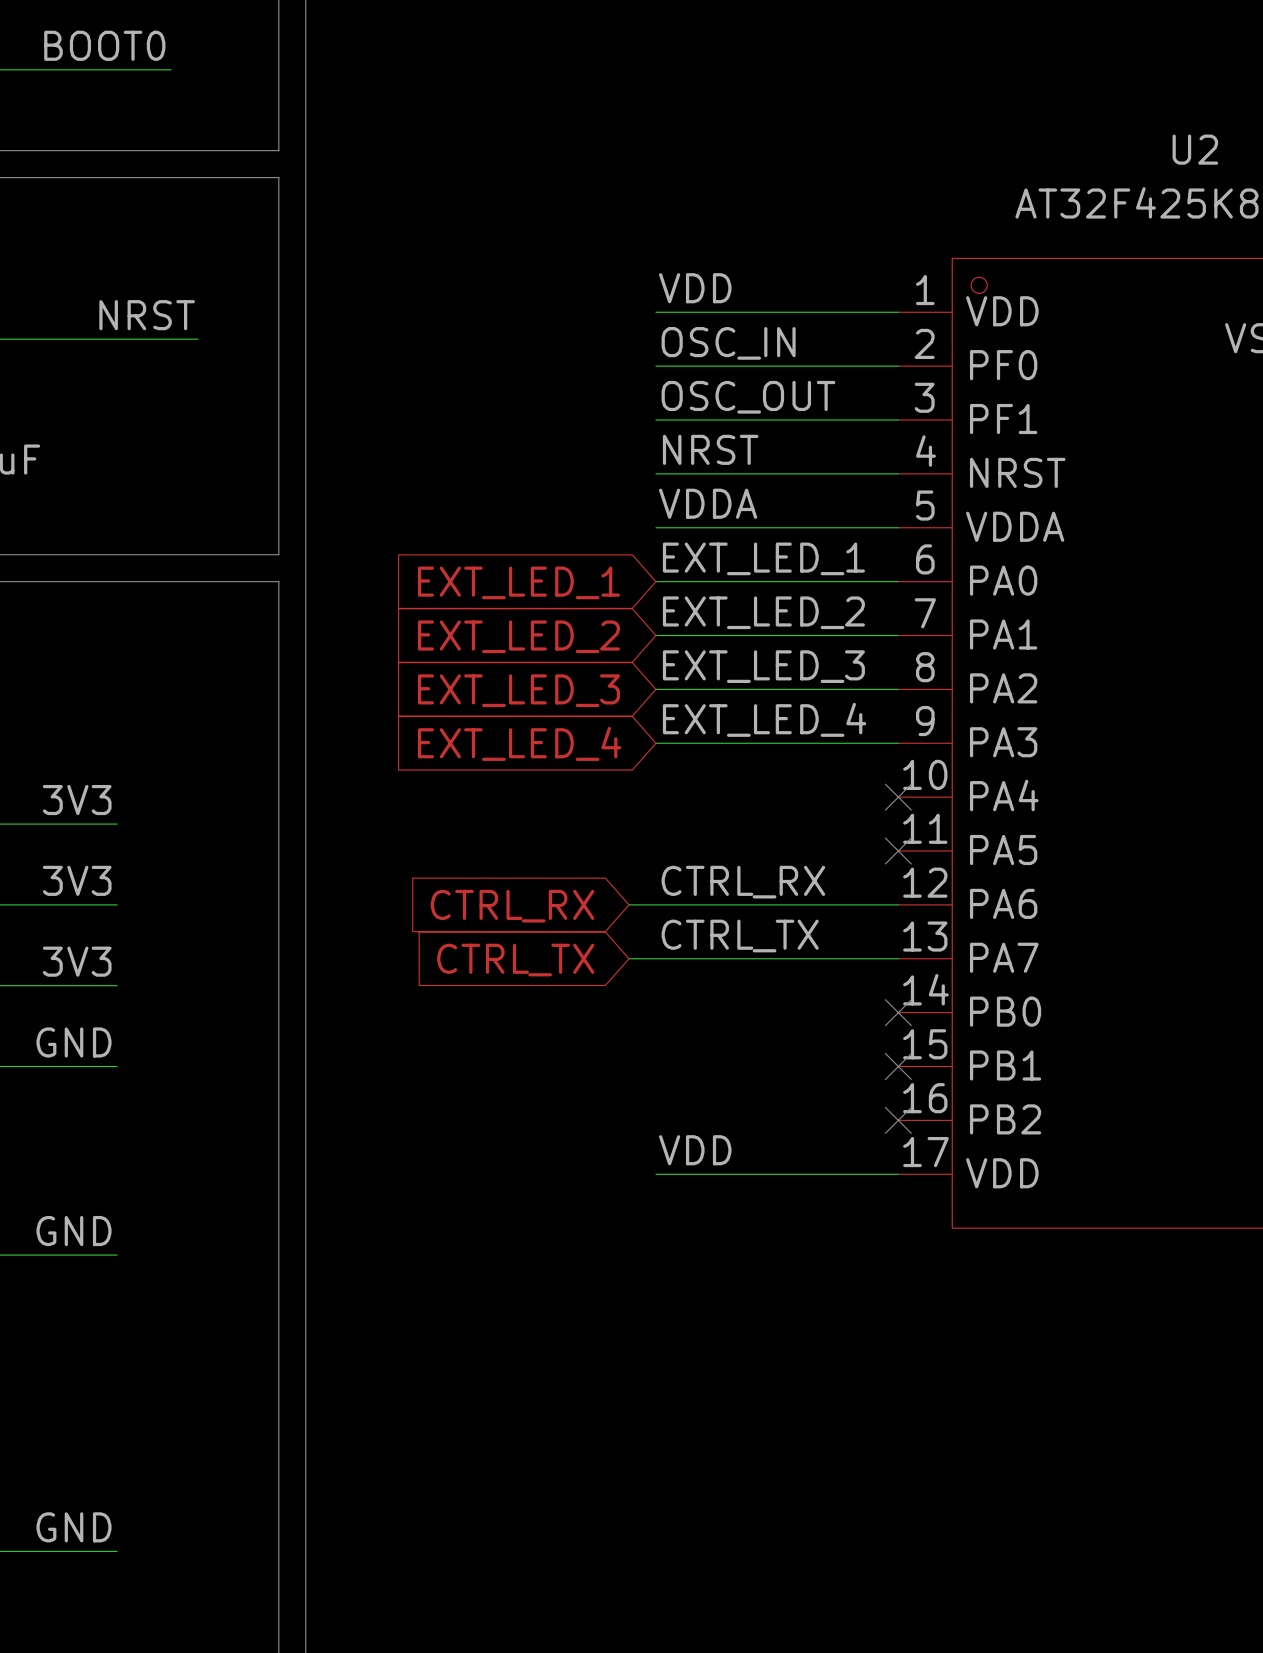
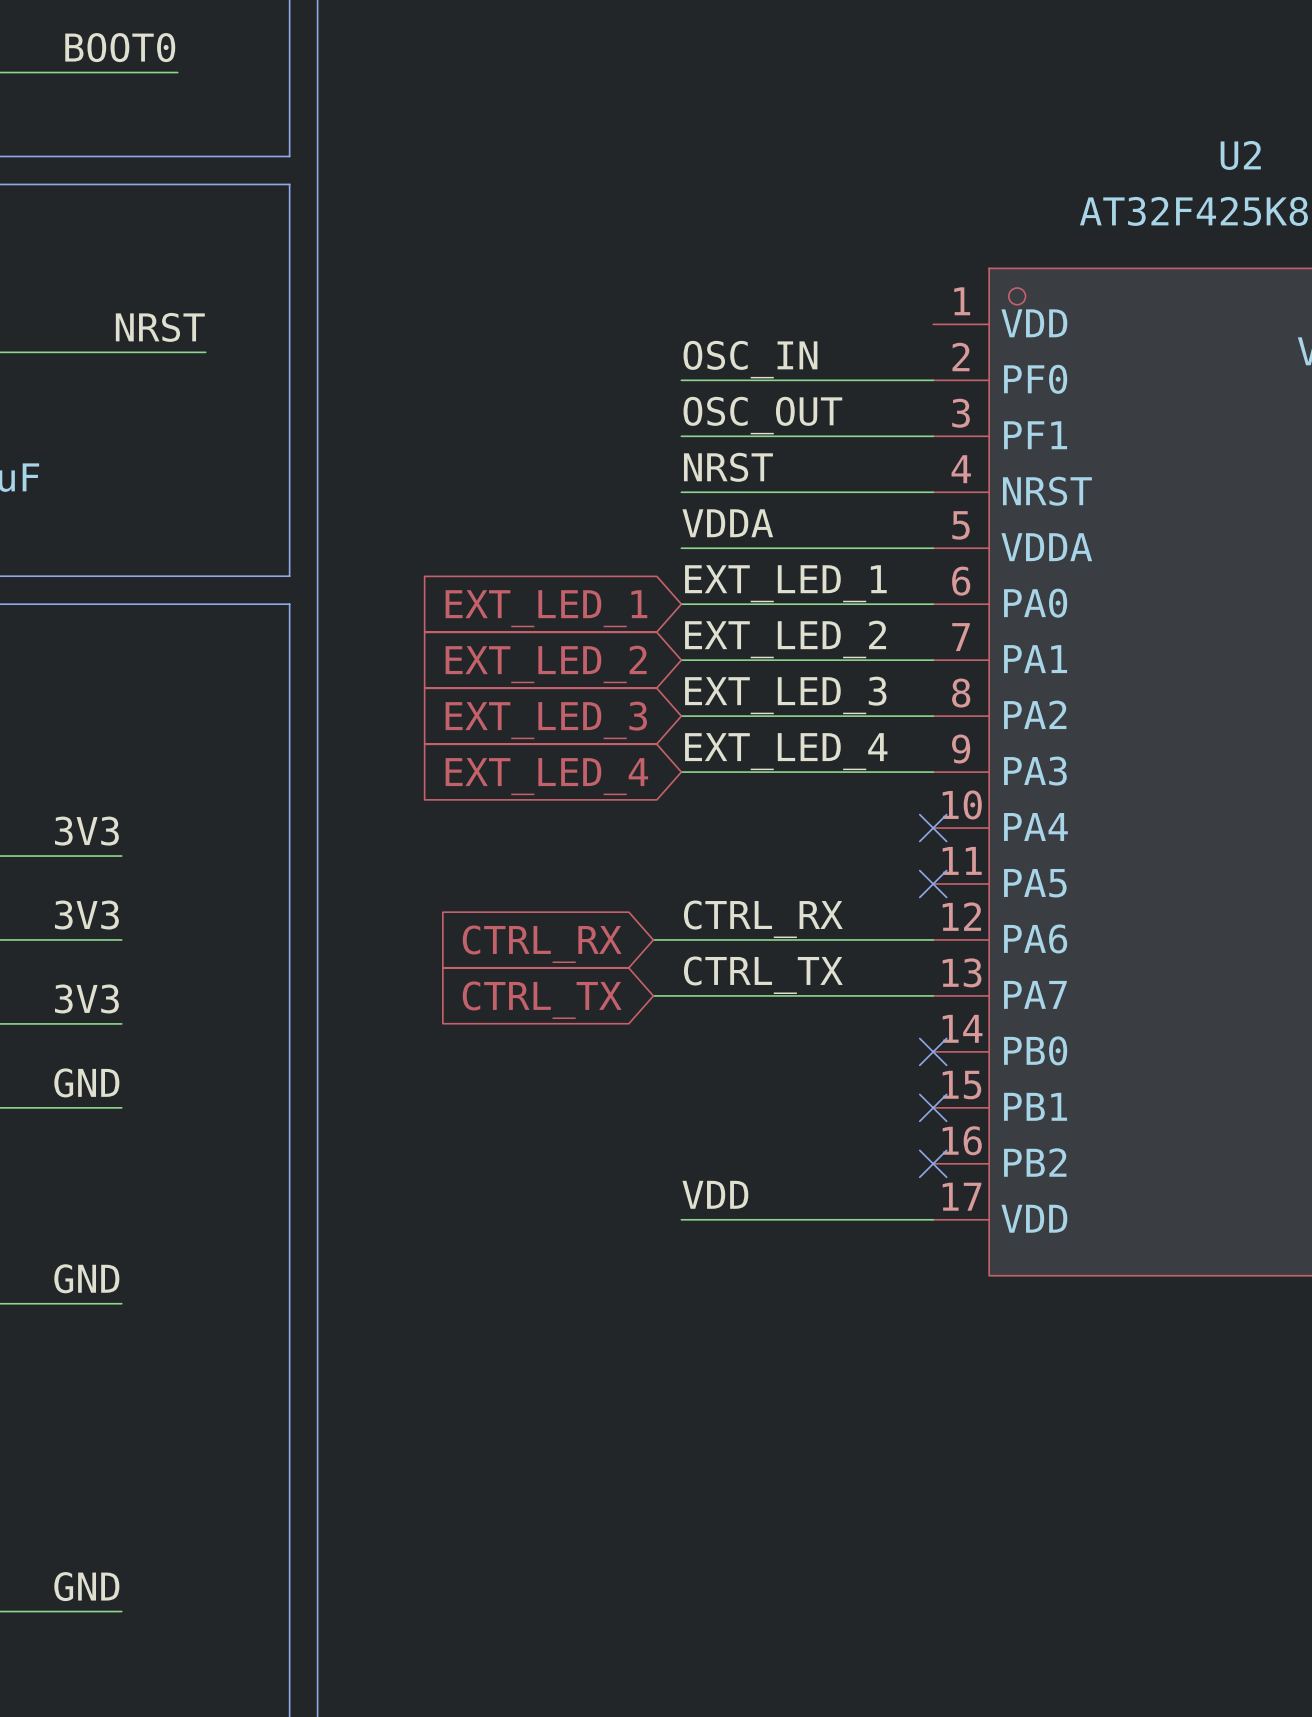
label: VDD (695, 288) -> none
wire: (655, 312) (898, 312) -> none

